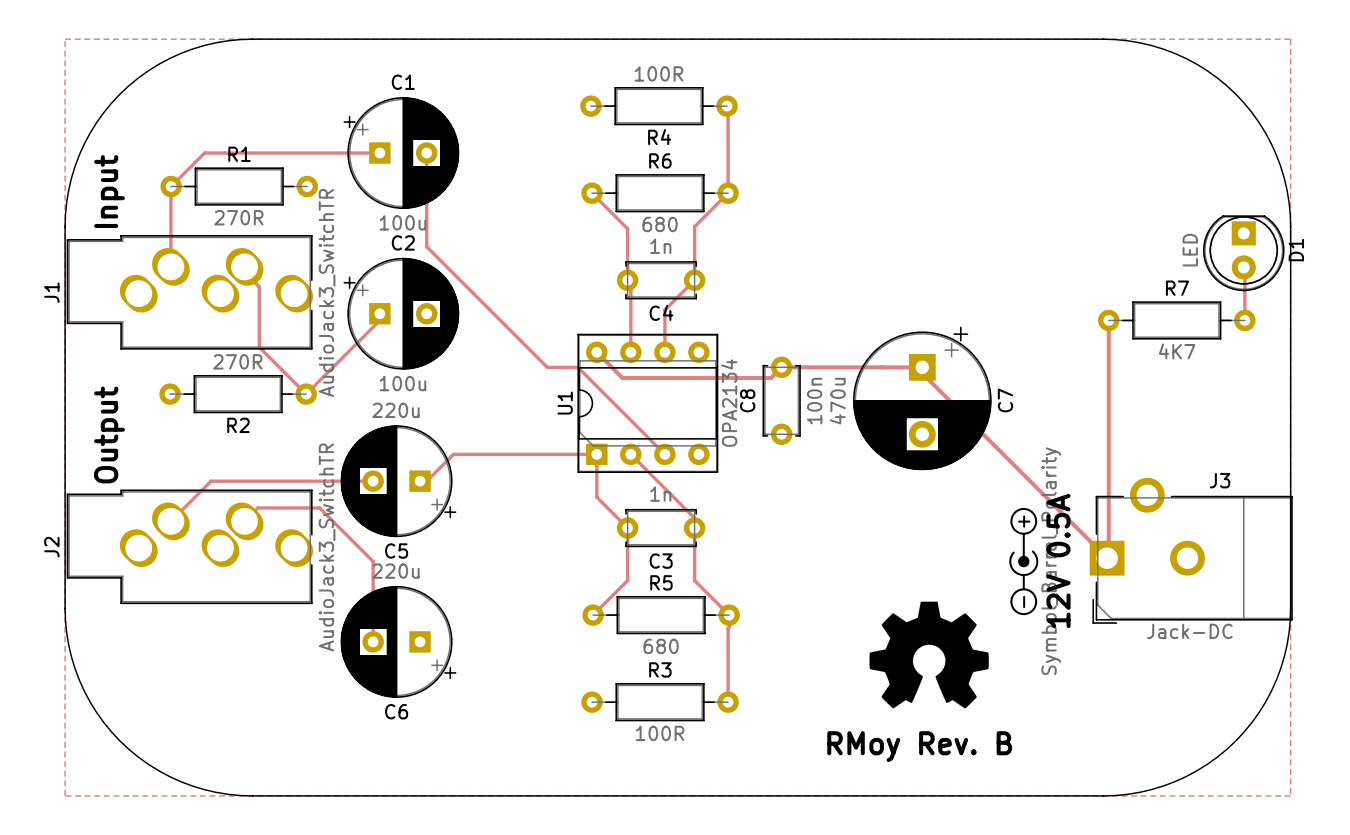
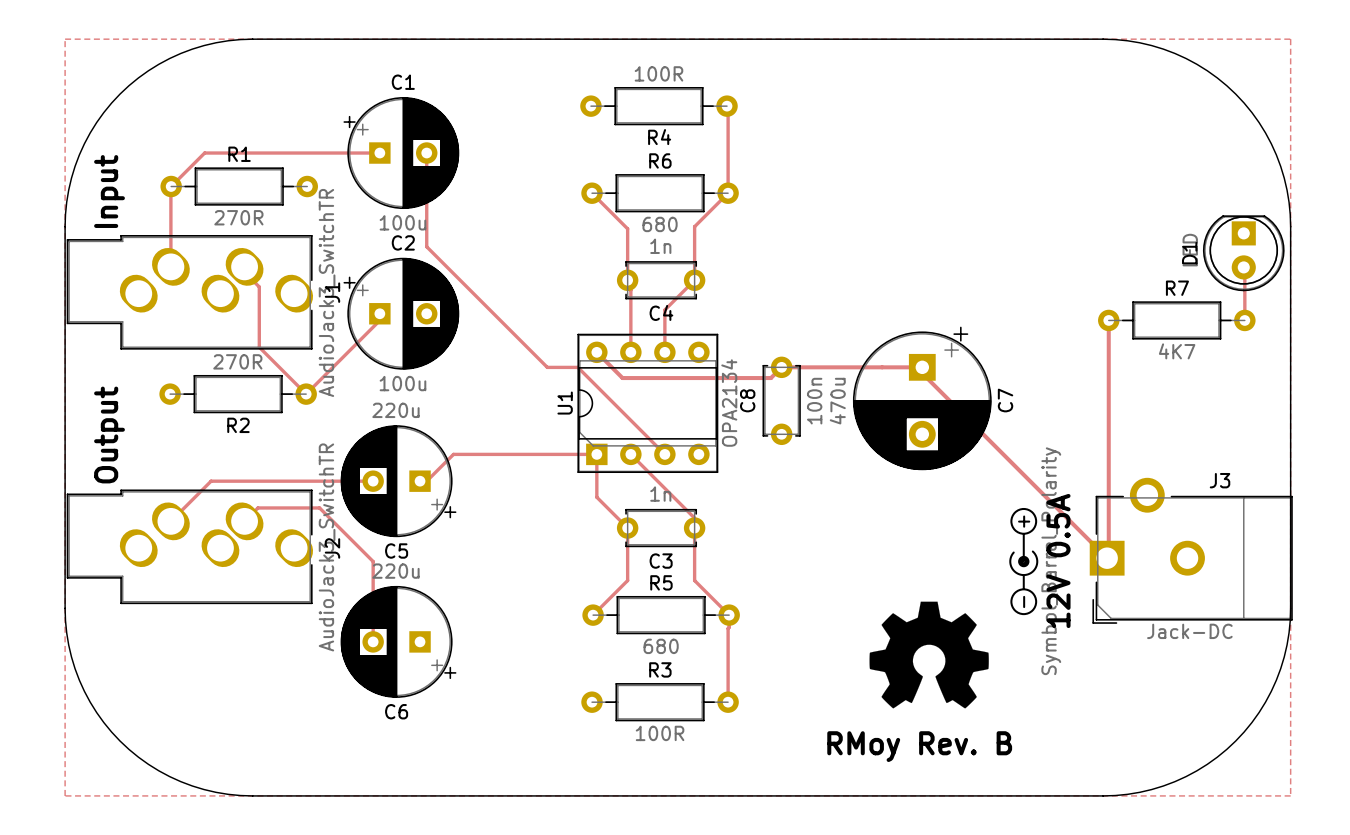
D1 name position: D1 (1296, 250) -> D1 (1189, 253)
J1 name position: J1 (51, 292) -> J1 (332, 292)
J2 name position: J2 (51, 547) -> J2 (332, 548)

